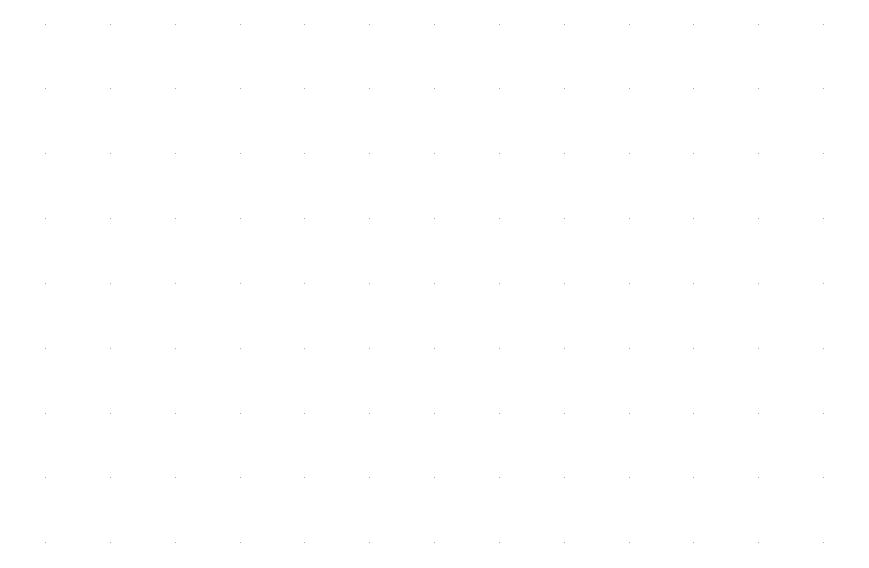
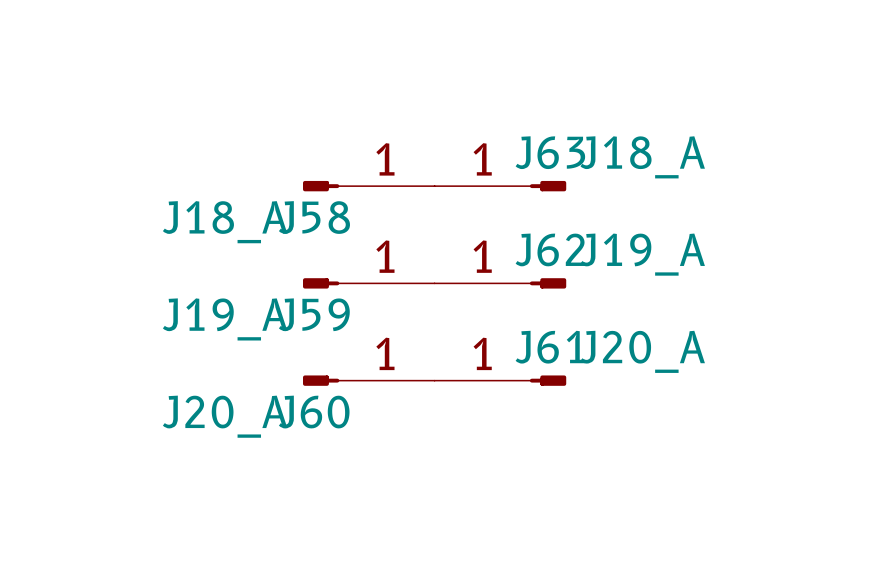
J58: none -> J18_A (368, 186)
J63: none -> J18_A (500, 186)
J59: none -> J19_A (368, 283)
J62: none -> J19_A (500, 283)
J60: none -> J20_A (368, 380)
J61: none -> J20_A (500, 380)

